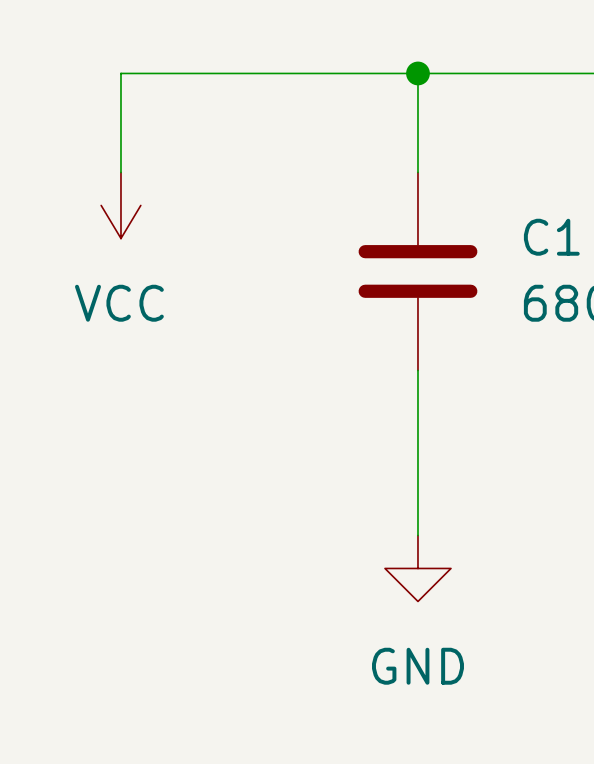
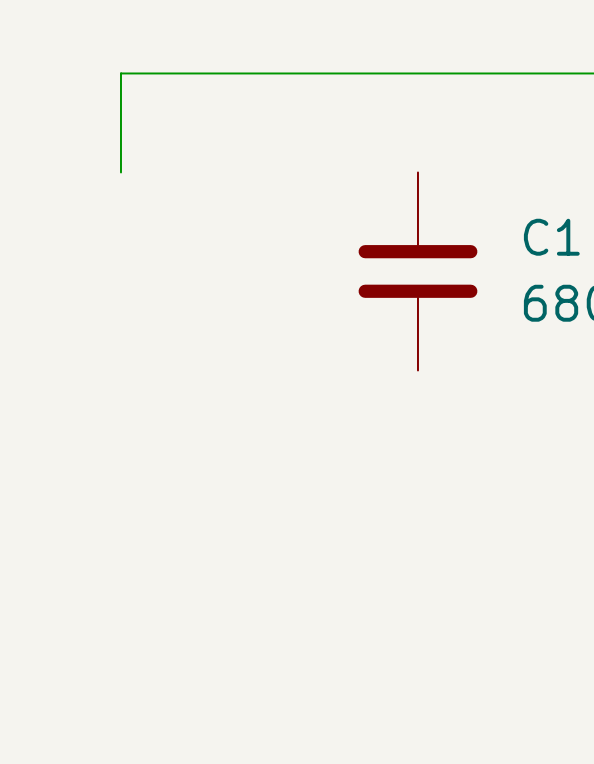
wire: (417, 73) (417, 172) -> none
junction: (417, 73) -> none
power symbol: VCC (120, 205) -> none
wire: (417, 370) (417, 535) -> none
power symbol: GND (417, 568) -> none

